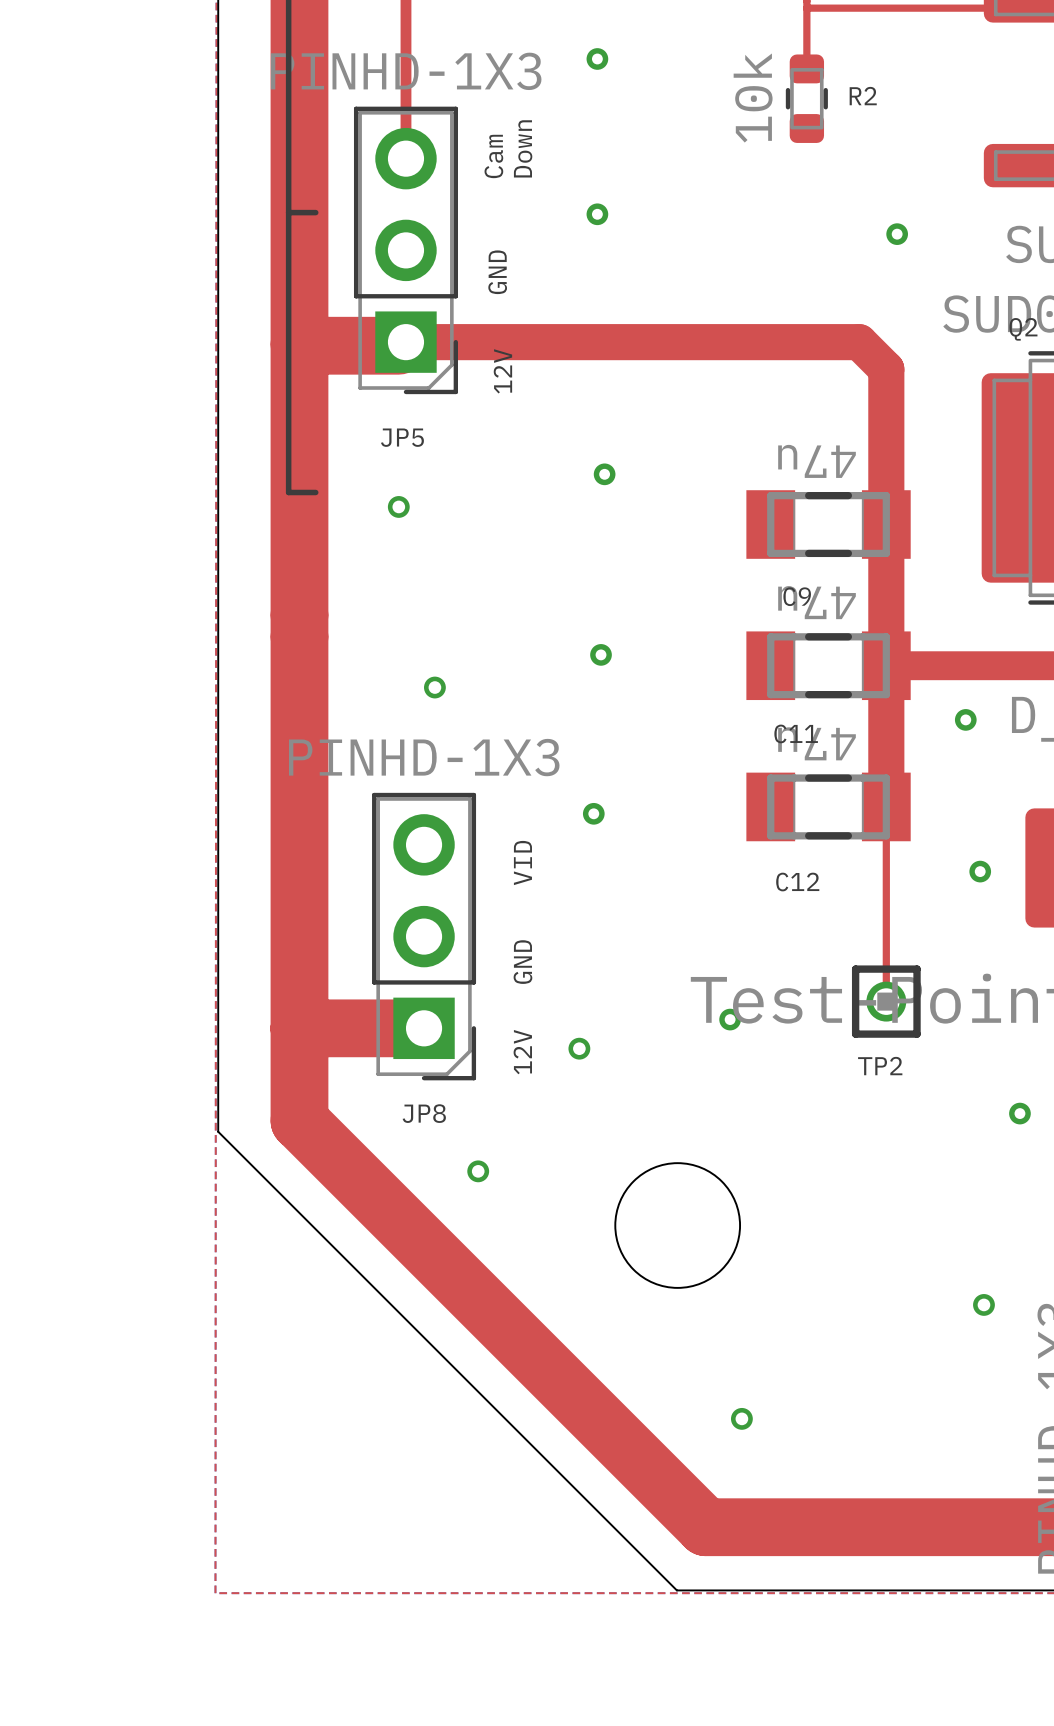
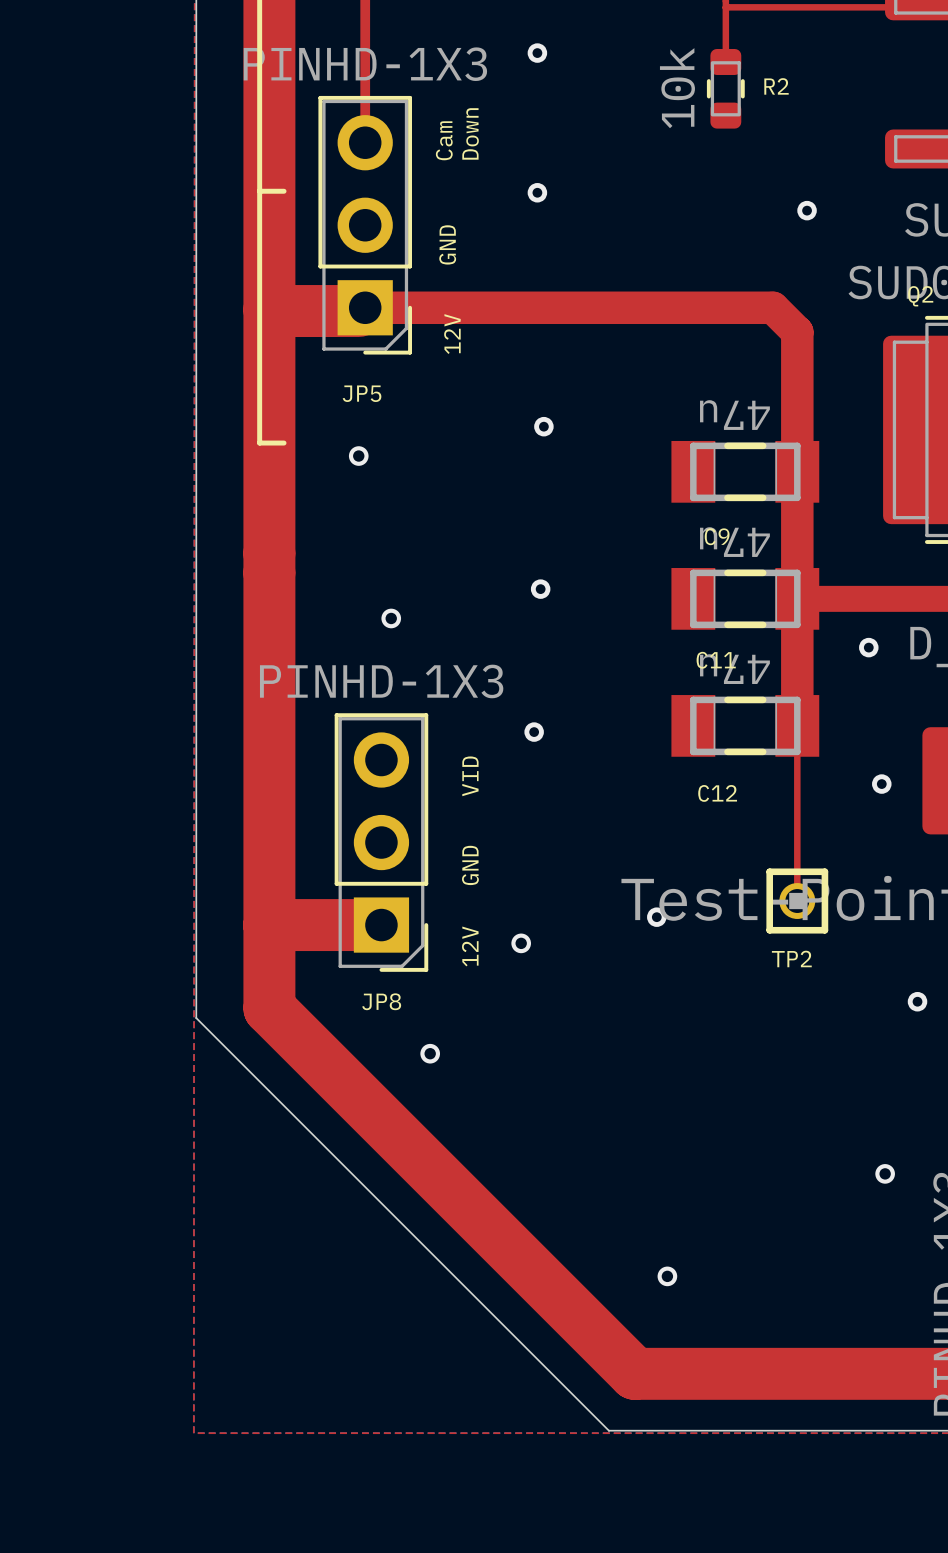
round board edge: [614, 1162, 741, 1289] -> none

